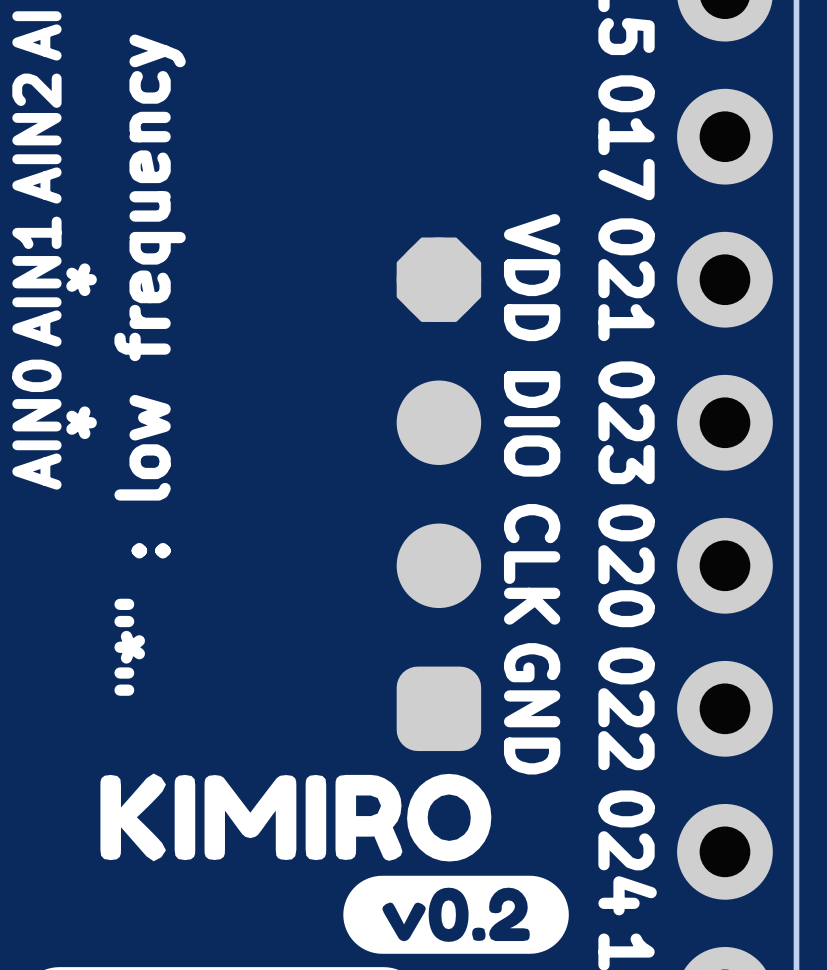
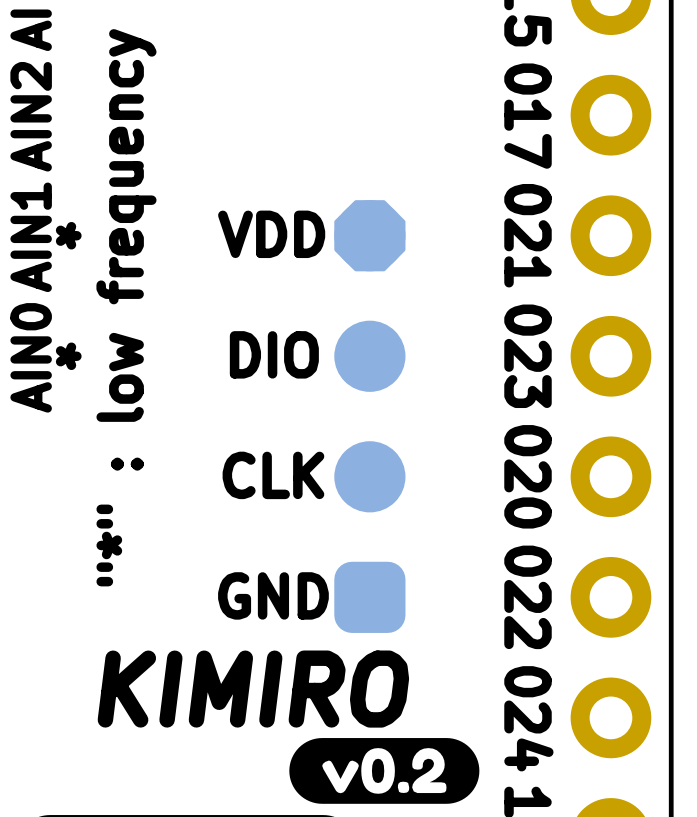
text rotation: 0° (532, 277) -> 90° counterclockwise (271, 234)
text position: VDD (532, 277) -> VDD (271, 234)
text rotation: 0° (532, 423) -> 90° counterclockwise (274, 354)
text position: DIO (532, 423) -> DIO (274, 354)
text rotation: 0° (532, 564) -> 90° counterclockwise (273, 475)
text position: CLK (532, 564) -> CLK (273, 475)
text rotation: 0° (532, 708) -> 90° counterclockwise (273, 595)
text position: GND (532, 708) -> GND (273, 595)
drawing: [100, 773, 492, 862] -> none
text: none -> KIMIRO (253, 689)

